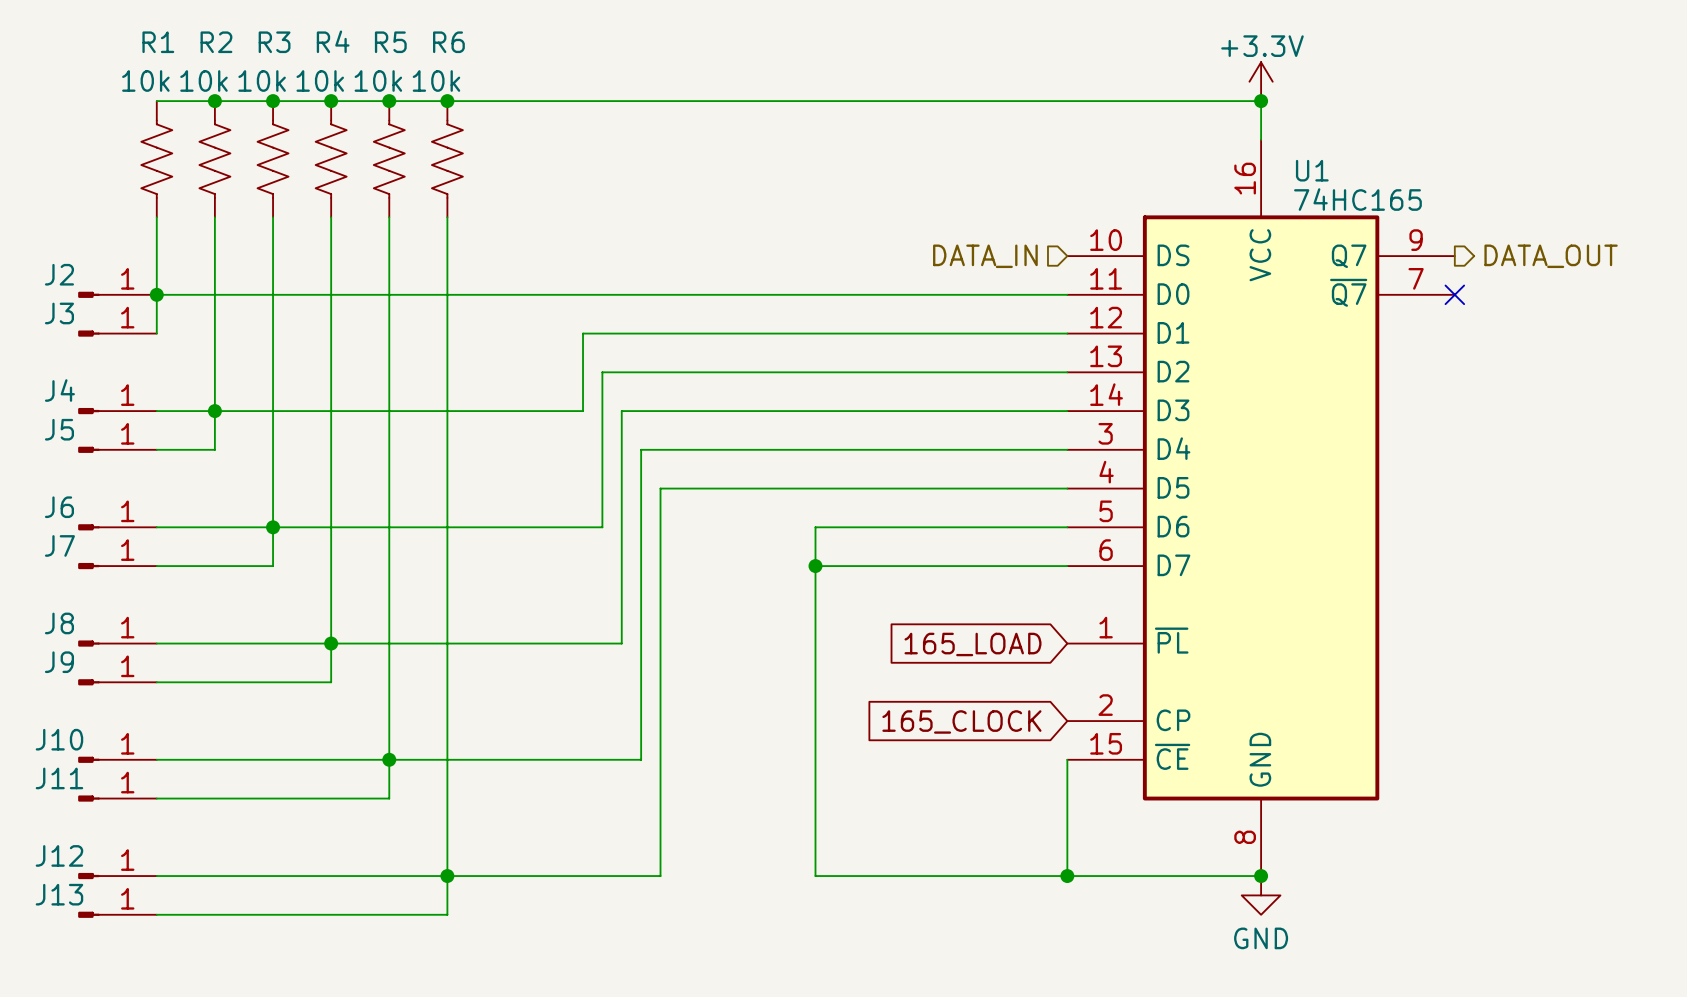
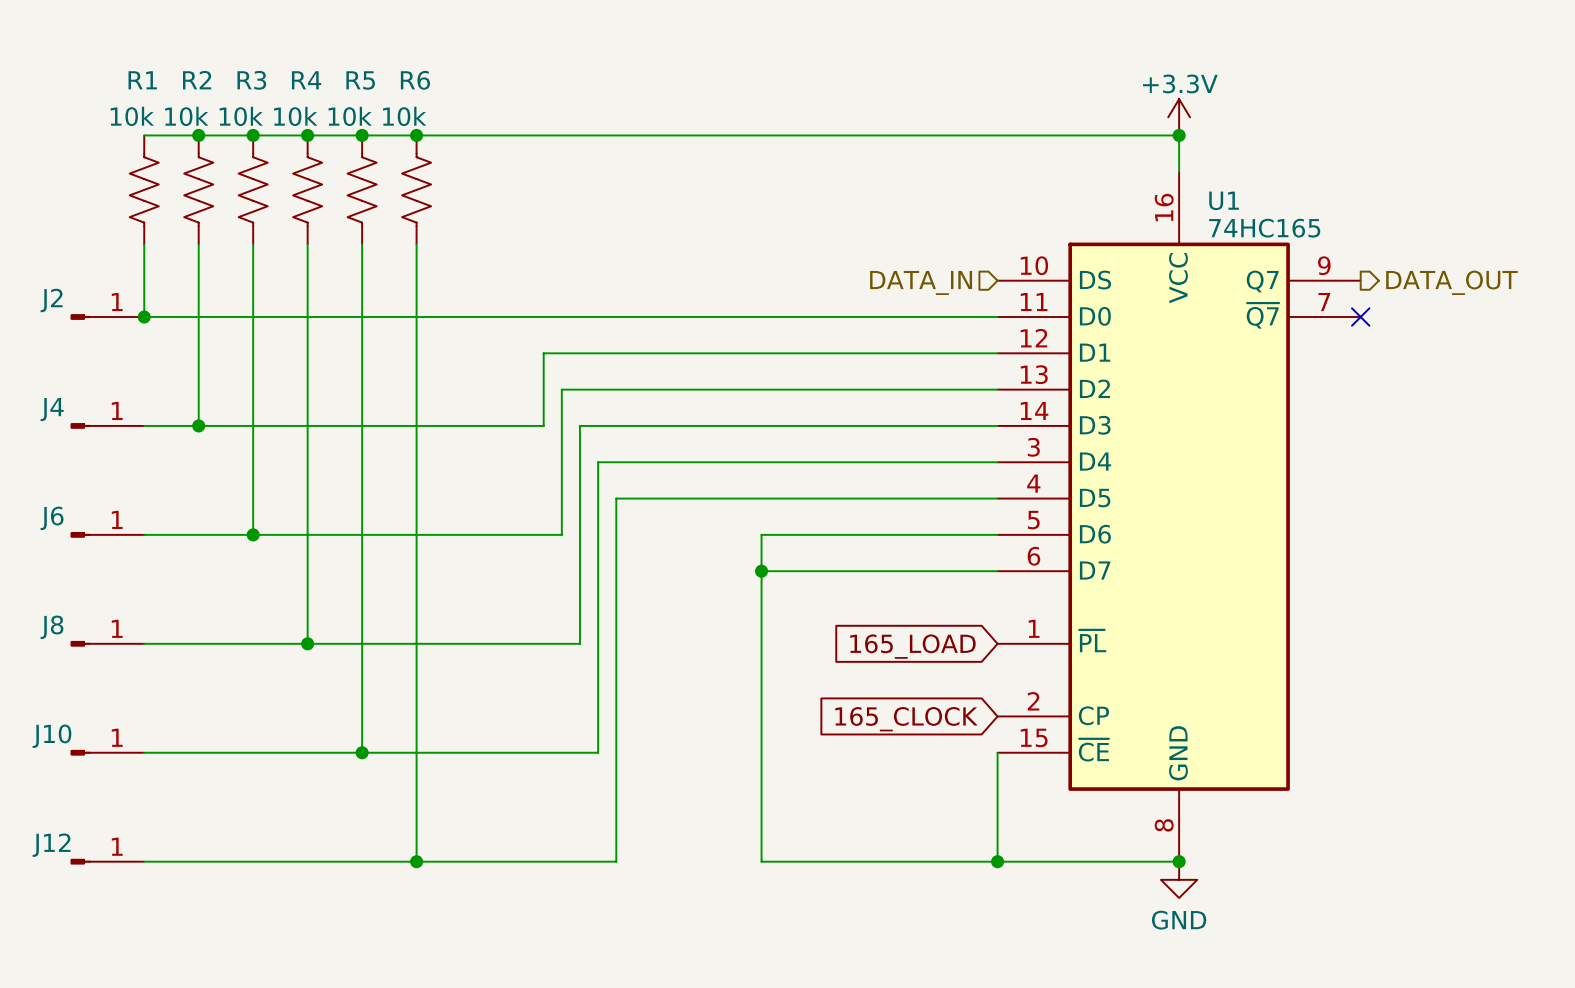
wire: (156, 294) (156, 333) -> none
J3: (117, 333) -> none
wire: (214, 411) (214, 449) (156, 449) -> none
J5: (117, 449) -> none
wire: (273, 527) (273, 566) (156, 566) -> none
J7: (117, 566) -> none
wire: (331, 643) (331, 682) (156, 682) -> none
J9: (117, 682) -> none
wire: (389, 759) (389, 798) (156, 798) -> none
J11: (117, 798) -> none
wire: (447, 876) (447, 914) (156, 914) -> none
J13: (117, 914) -> none

